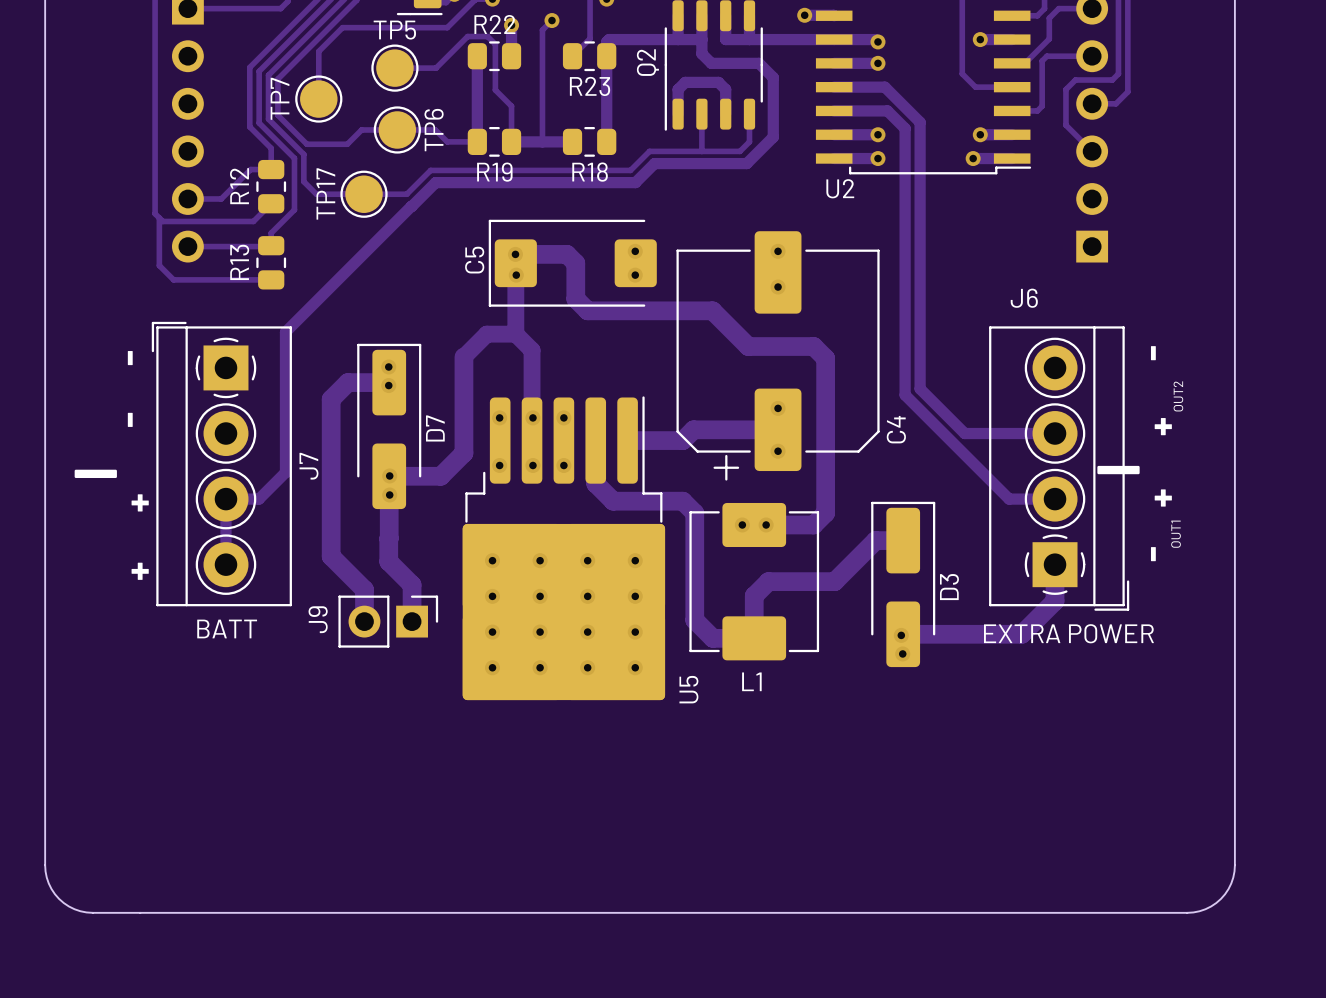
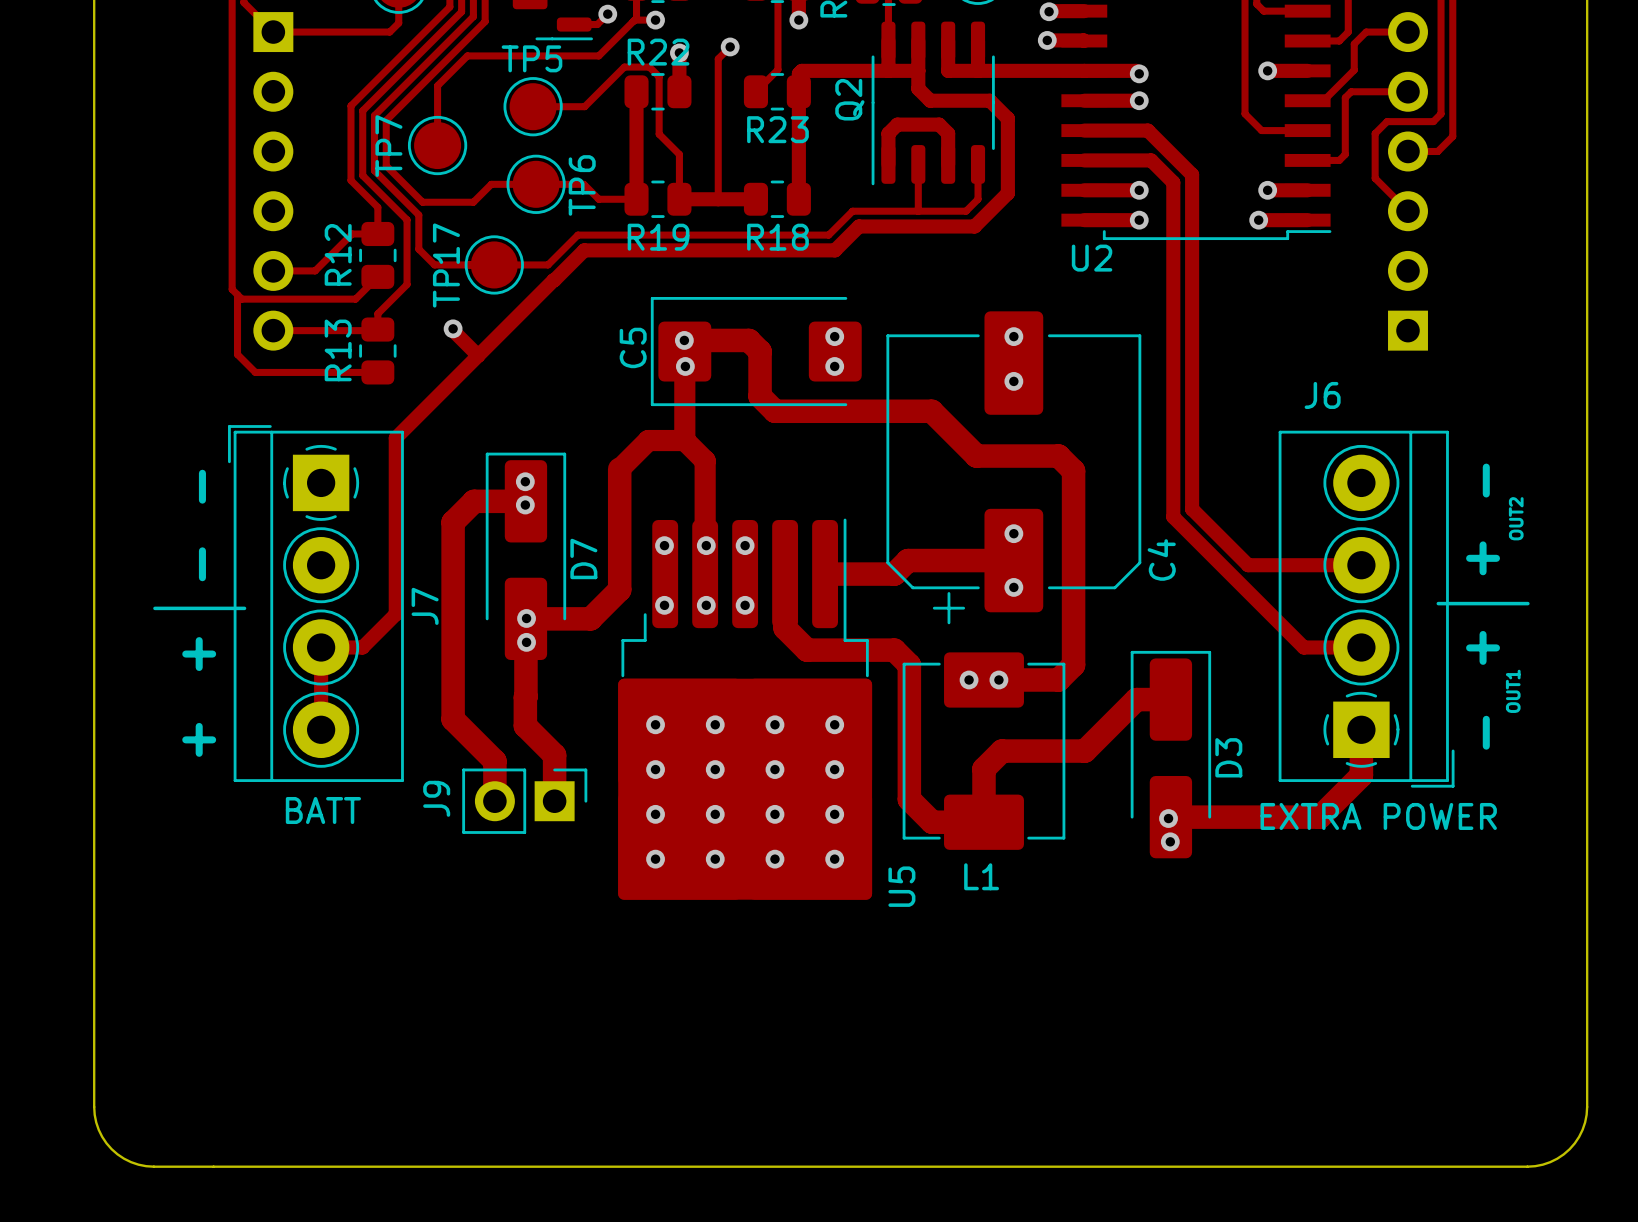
track: none -> (453, 328) (478, 355)
via: none -> (453, 328)

